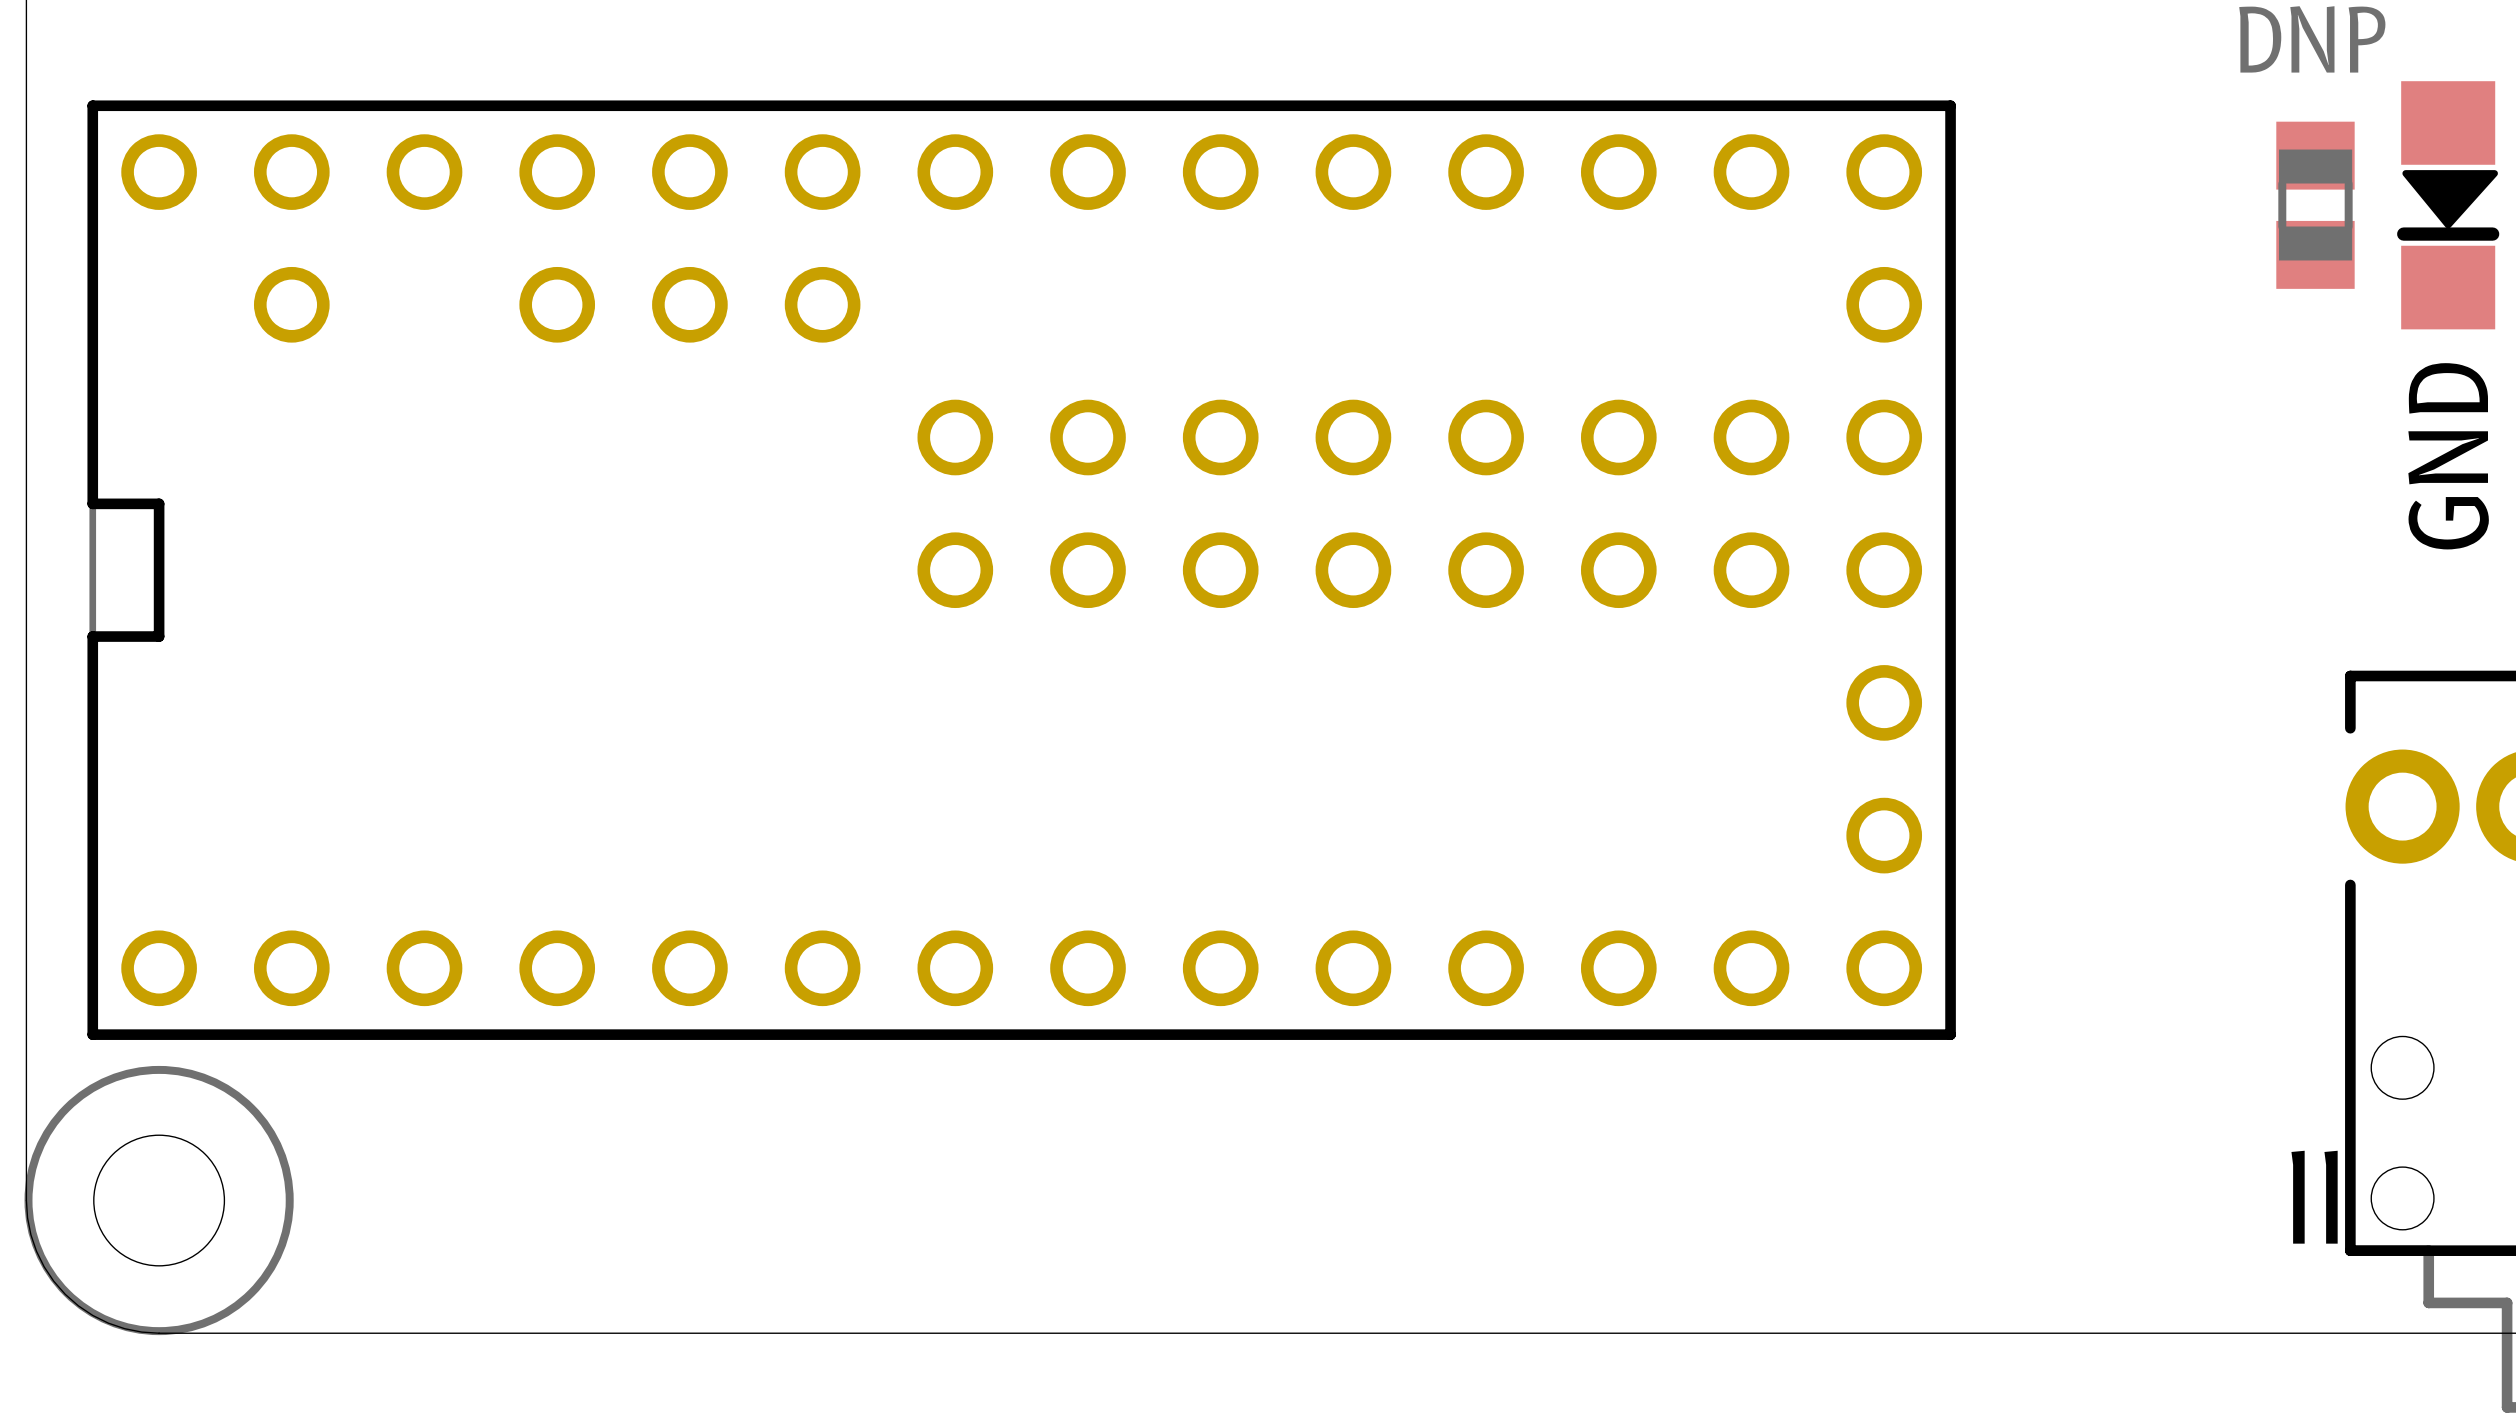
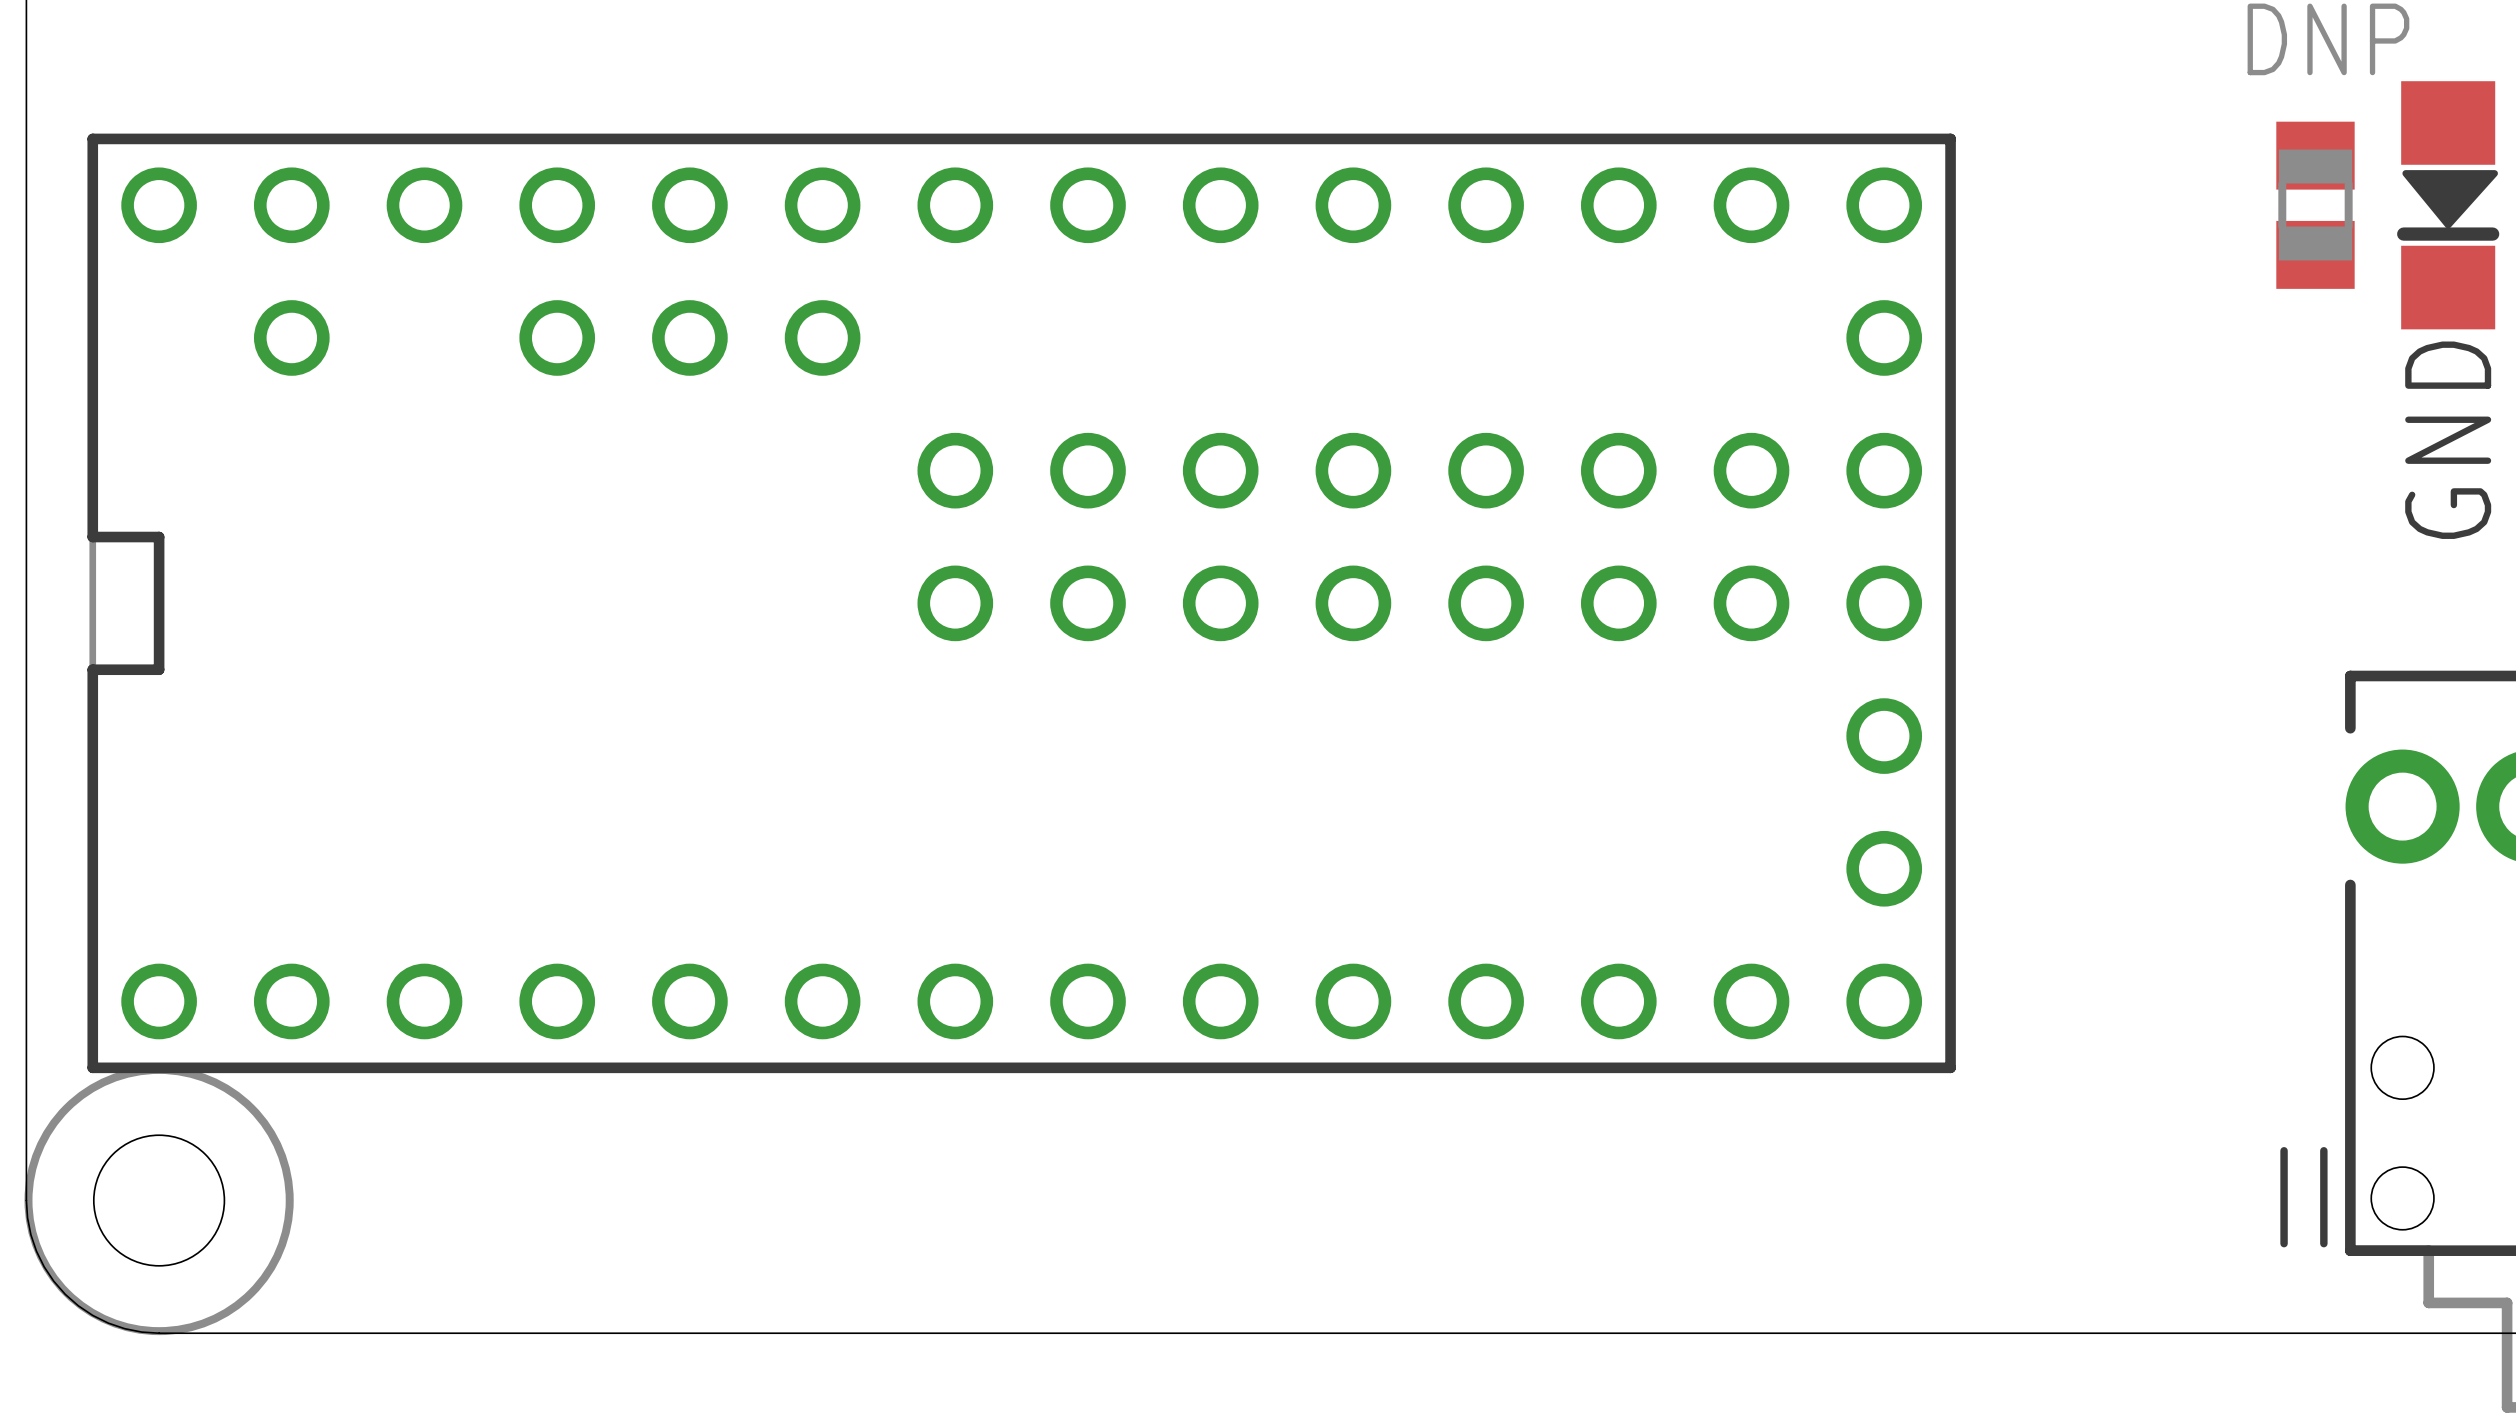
part position: (1021, 570) -> (1021, 603)

